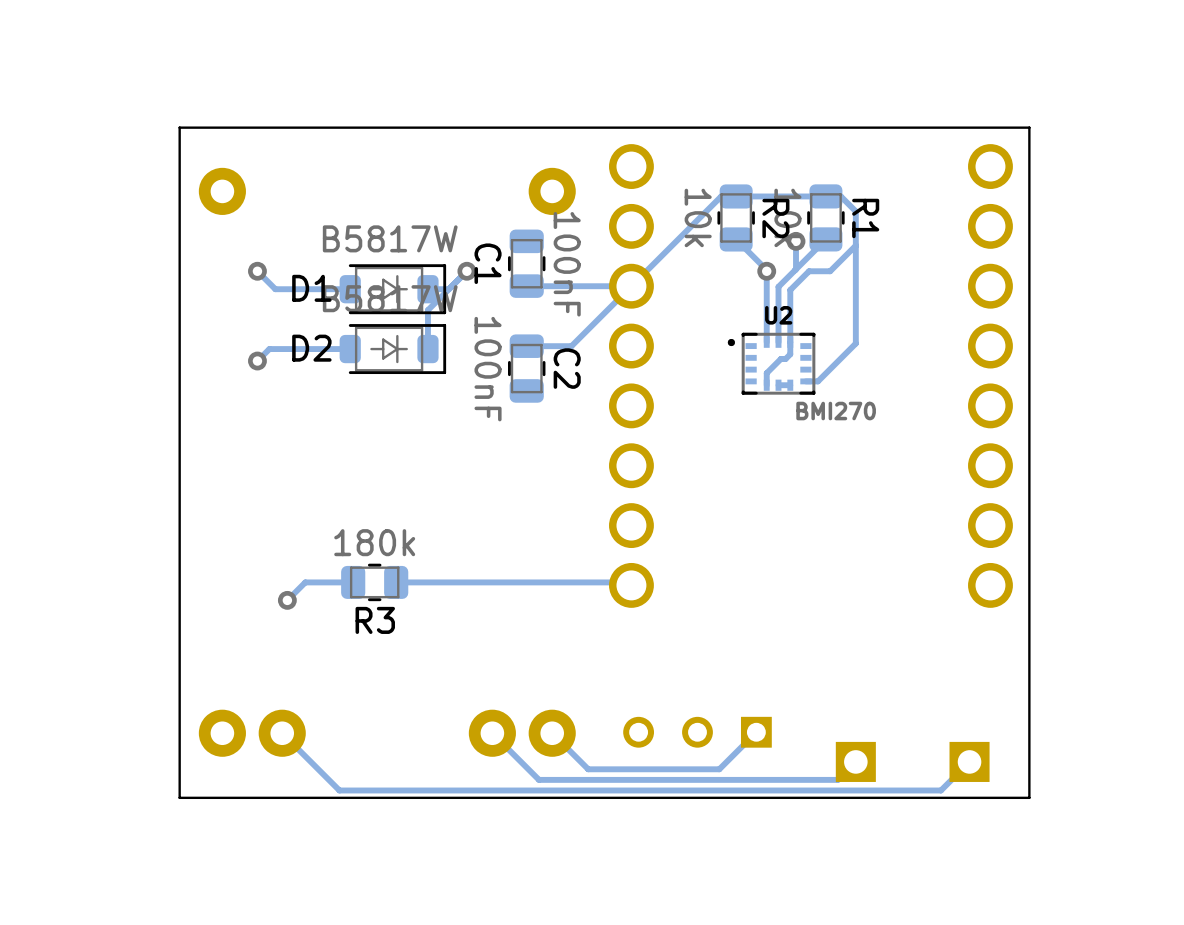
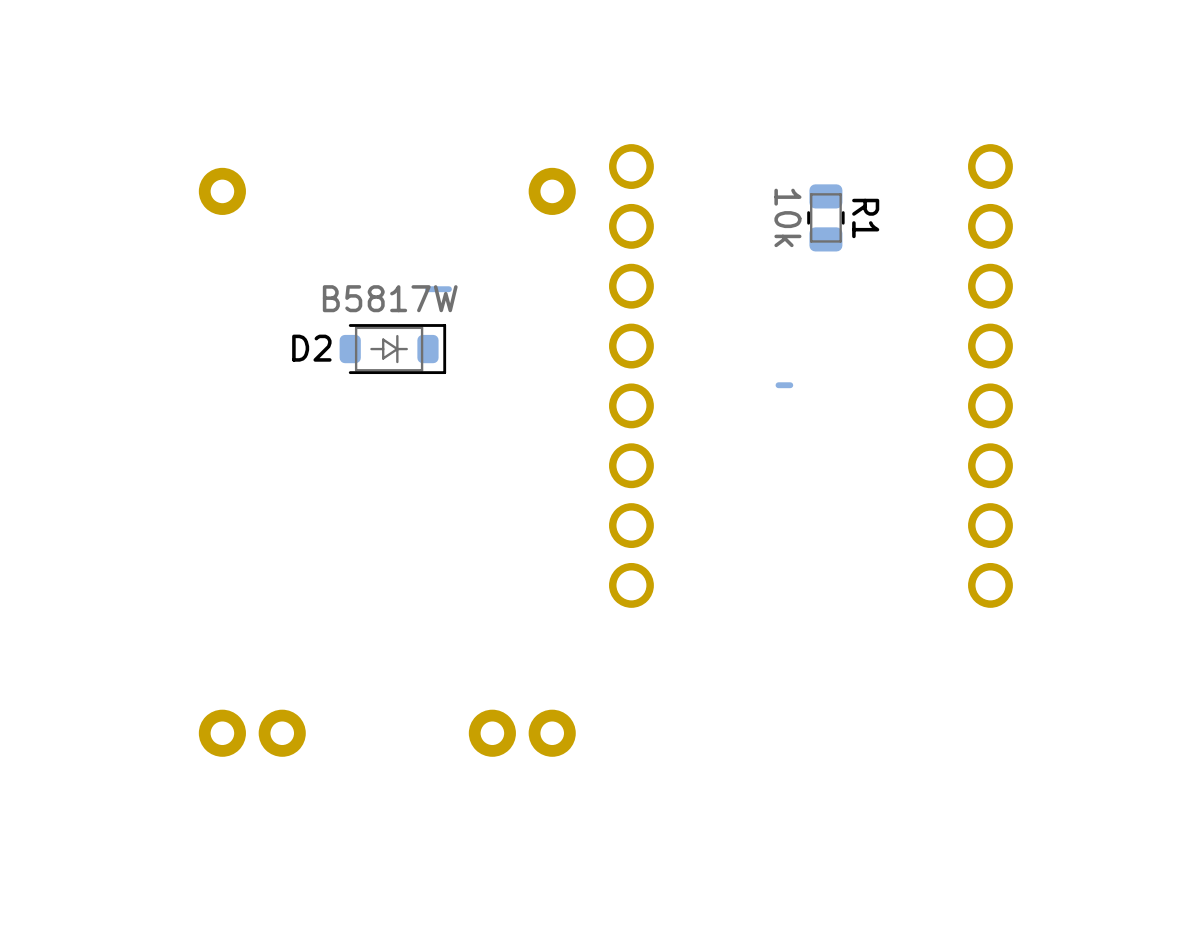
board edge: (1029, 127) (179, 127) (179, 797) (1029, 797) (1029, 127) -> none
R2: 10k (736, 217) -> none
track: (736, 239) (766, 270) (766, 342) -> none
track: (825, 239) (778, 286) (778, 342) -> none
track: (796, 241) (796, 269) -> none
via: (796, 241) -> none
track: (855, 245) (830, 271) (809, 271) (790, 290) (790, 354) (785, 359) (780, 359) (766, 373) (766, 385) -> none
C1: 100nF (526, 263) -> none
track: (257, 271) (275, 289) (350, 289) -> none
via: (257, 271) -> none
track: (466, 271) (427, 310) (427, 349) -> none
via: (466, 271) -> none
via: (766, 271) -> none
track: (631, 286) (526, 286) -> none
D1: B5817W (392, 289) -> none
track: (526, 346) (571, 346) (721, 196) (840, 196) (855, 211) (855, 343) (817, 381) (805, 381) -> none
track: (350, 349) (269, 349) (257, 361) -> none
via: (257, 361) -> none
U2: BMI270 (771, 363) -> none
C2: 100nF (526, 368) -> none
track: (353, 582) (305, 582) (287, 600) -> none
R3: 180k (374, 582) -> none
track: (396, 582) (628, 582) (631, 585) -> none
via: (287, 600) -> none
part: (697, 732) -> none
track: (756, 732) (719, 769) (588, 769) (552, 733) -> none
track: (282, 733) (339, 790) (940, 790) (969, 761) -> none
track: (492, 733) (539, 779) (837, 779) (855, 761) -> none
part: (855, 761) -> none
part: (969, 761) -> none

